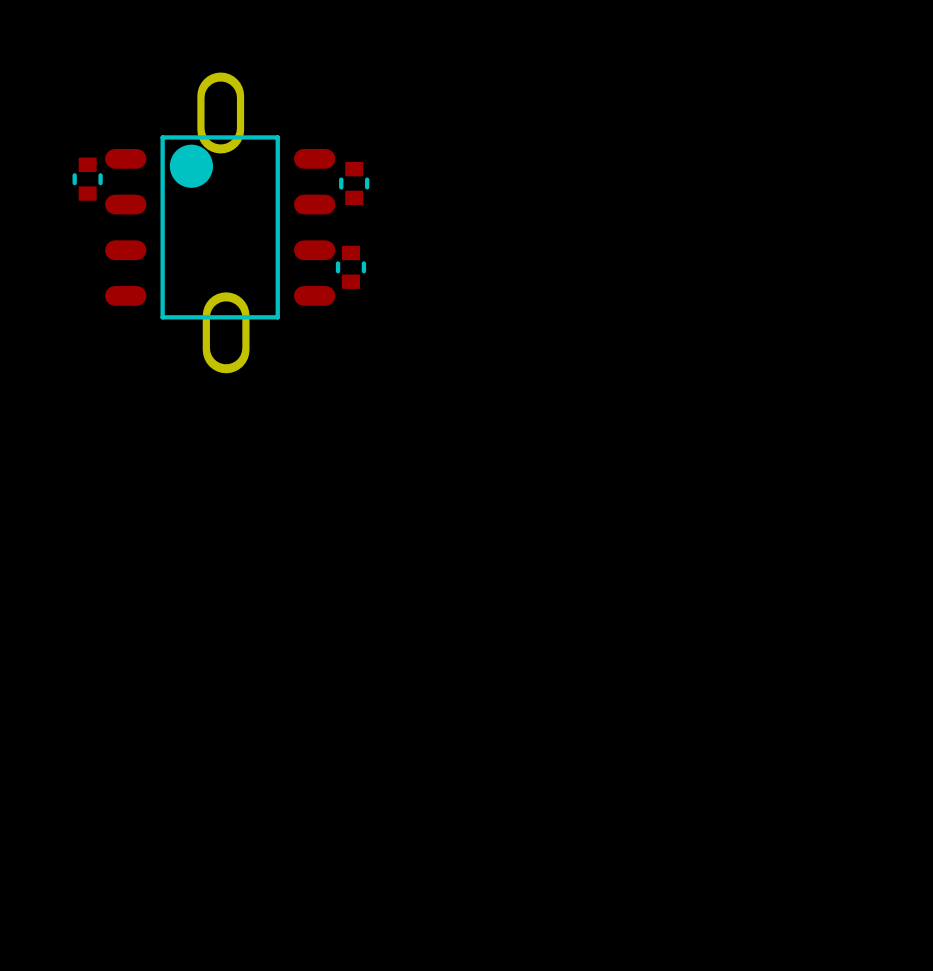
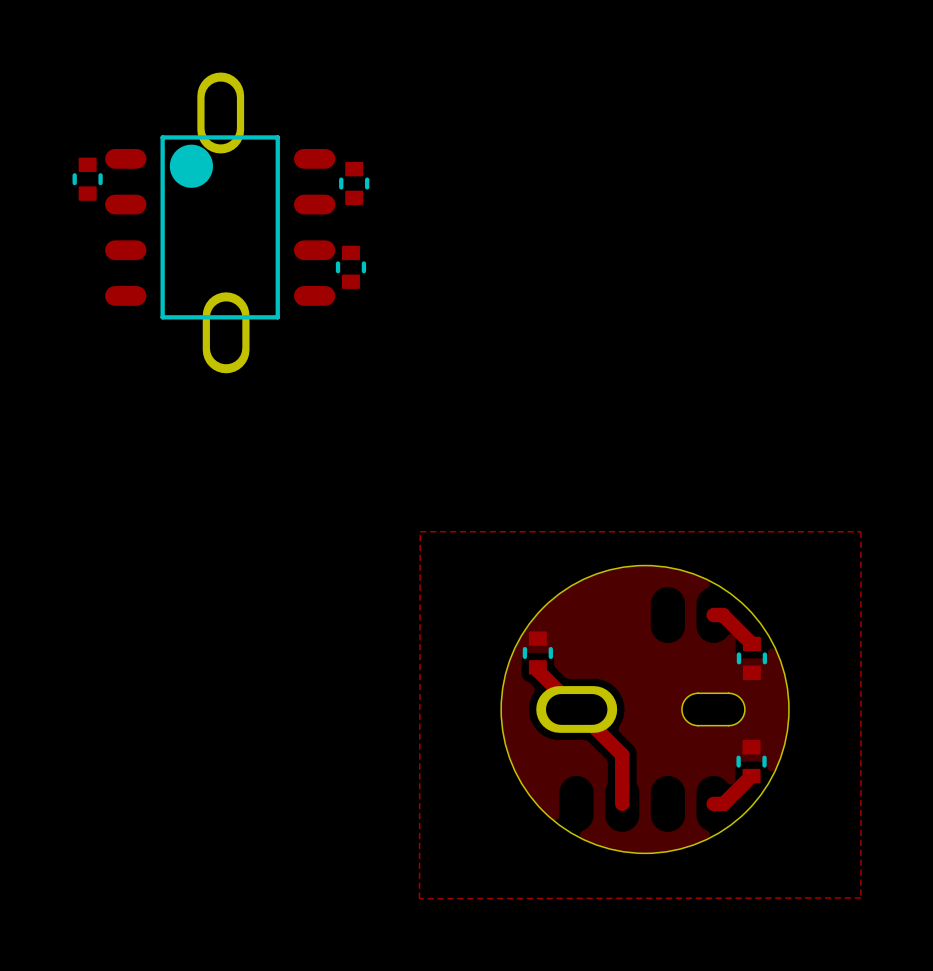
zone outline: none -> (420, 531) (860, 531) (860, 897) (419, 898) (420, 531)
round board edge: none -> [501, 565, 789, 854]
track: none -> (713, 615) (722, 615) (751, 643)
part: none -> (537, 652)
part: none -> (751, 658)
track: none -> (537, 667) (537, 670) (622, 754) (622, 803)
board edge: none -> (561, 693) (599, 695) (607, 705) (606, 716) (601, 722) (593, 725) (561, 725) (553, 723) (546, 715) (545, 705) (552, 696) (561, 693)
board edge: none -> (698, 693) (728, 693) (736, 695) (744, 705) (742, 717) (736, 723) (730, 725) (698, 725) (690, 723) (683, 716) (682, 705) (688, 696) (698, 693)
part: none -> (576, 709)
part: none -> (751, 761)
track: none -> (751, 776) (723, 803) (713, 803)

